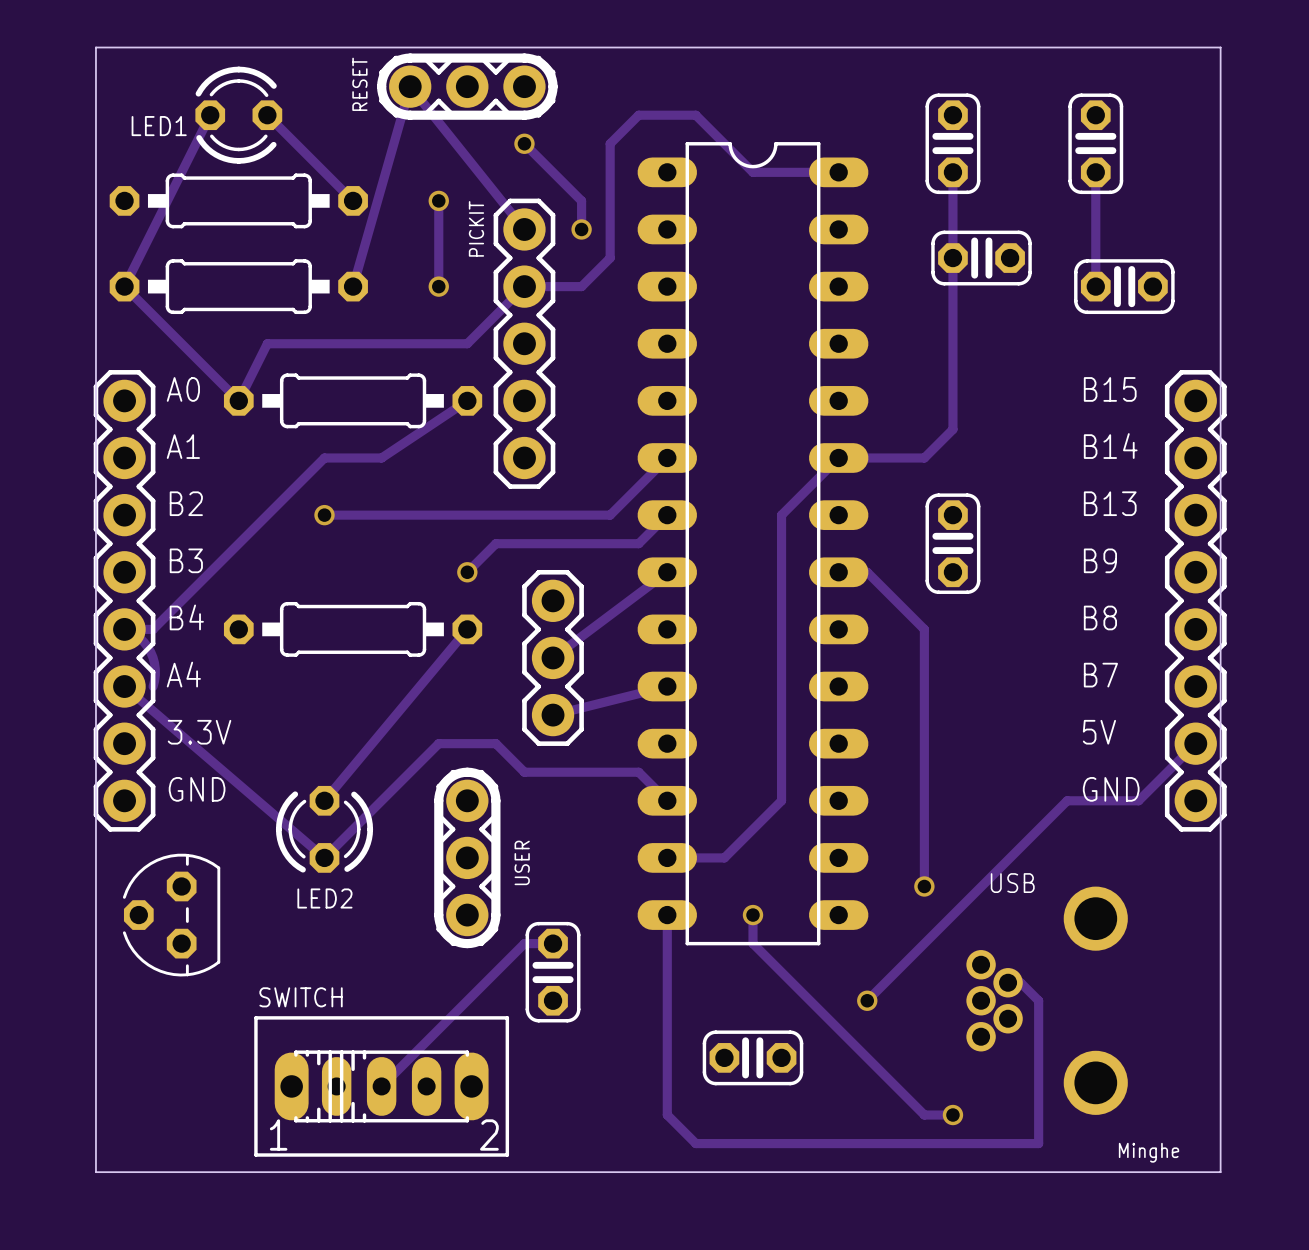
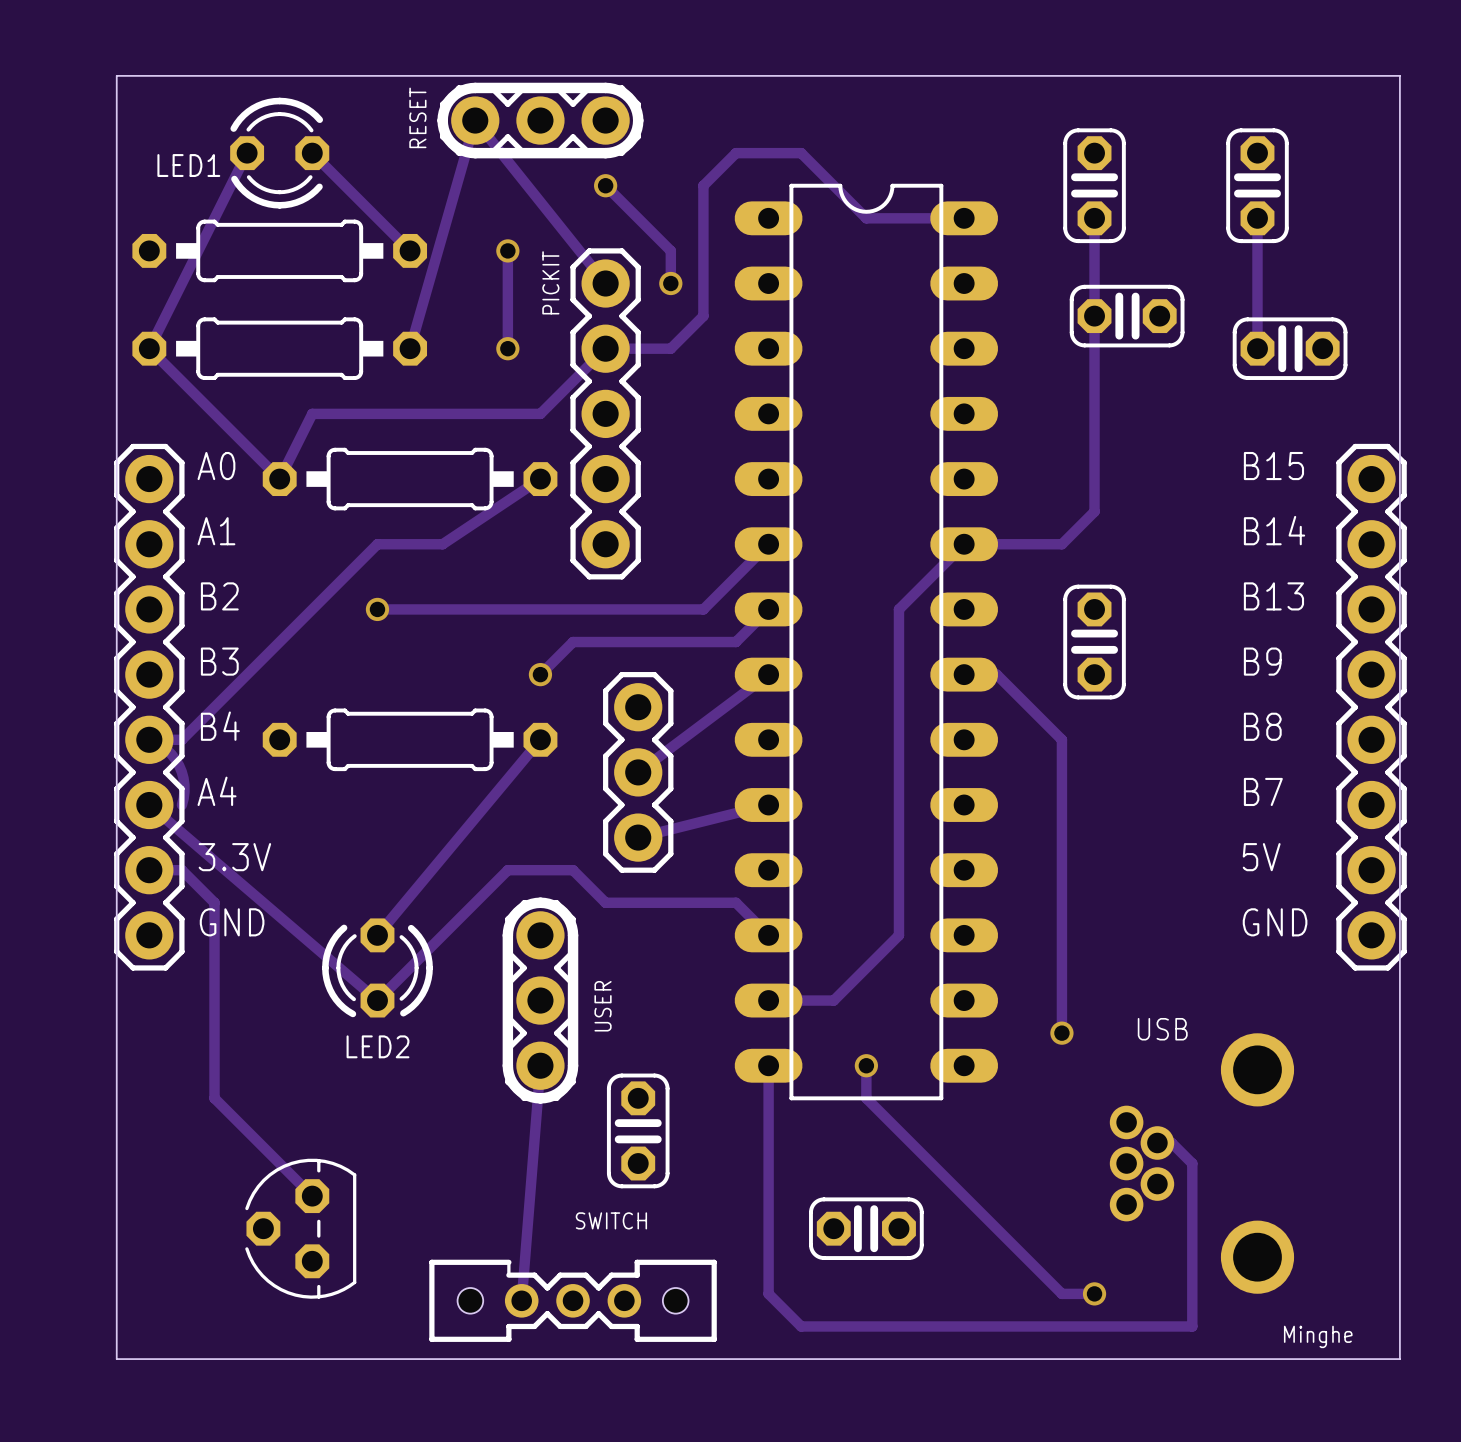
track: none -> (149, 870) (181, 870) (214, 902) (214, 1098) (312, 1196)
track: (1195, 743) (1138, 800) (1067, 800) (867, 1000) -> none
part position: (171, 915) -> (300, 1228)
track: none -> (540, 1065) (521, 1300)
track: (553, 943) (524, 943) (381, 1086) -> none
via: (867, 1000) -> none
text: none -> SWITCH (611, 1220)
SWITCH: (381, 1086) -> none
part: none -> (573, 1300)

